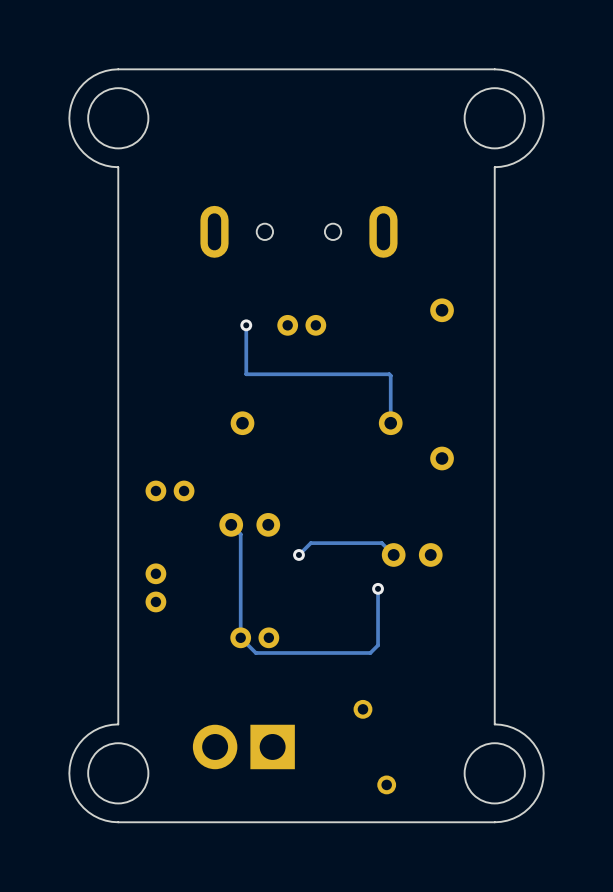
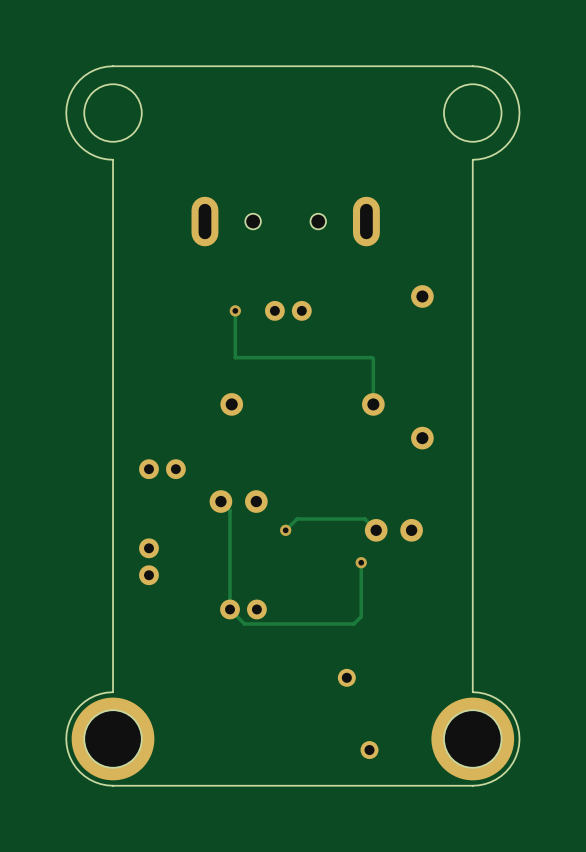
part: (243, 746) -> none
part: none -> (113, 738)
part: none -> (472, 738)

